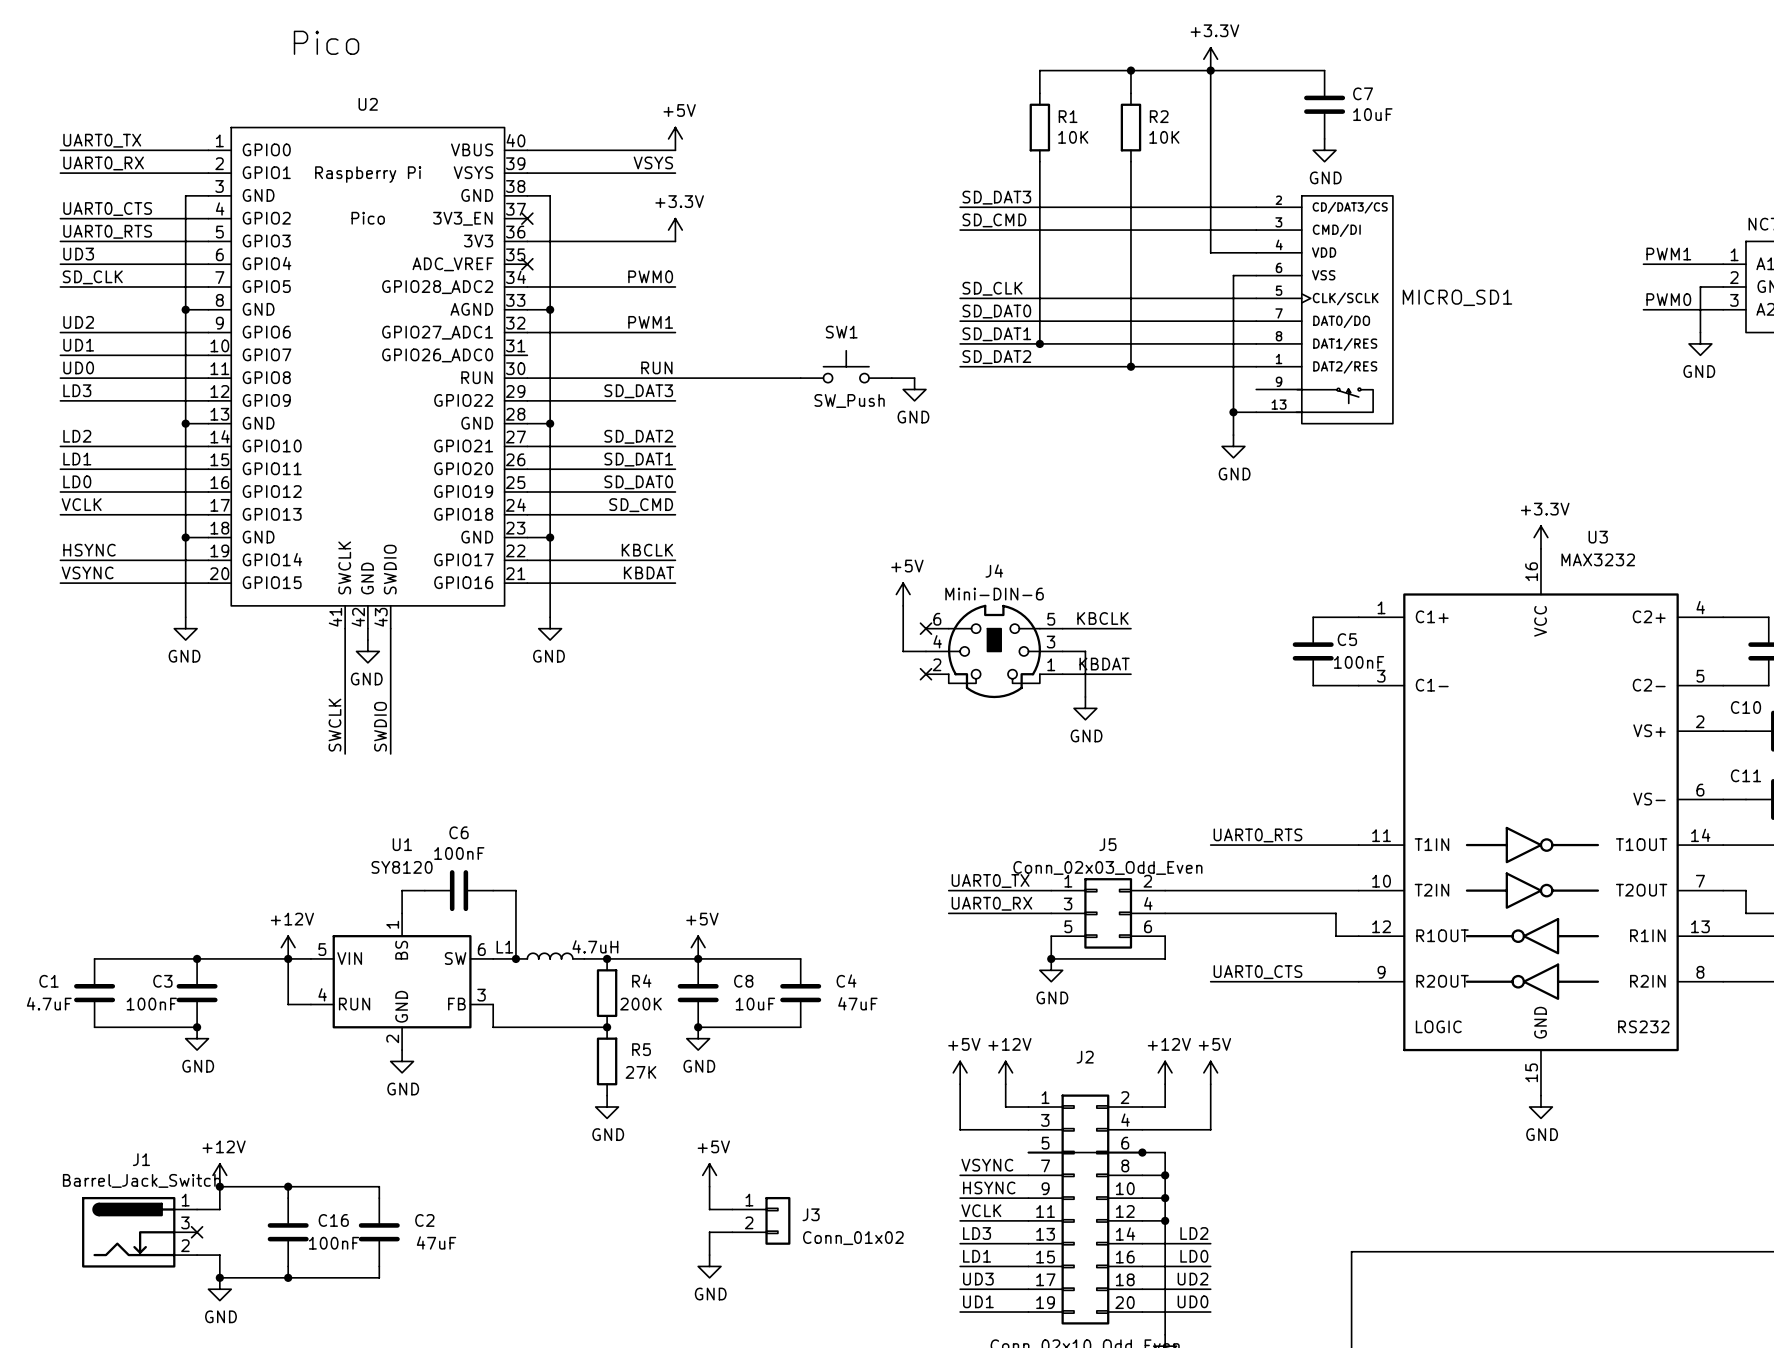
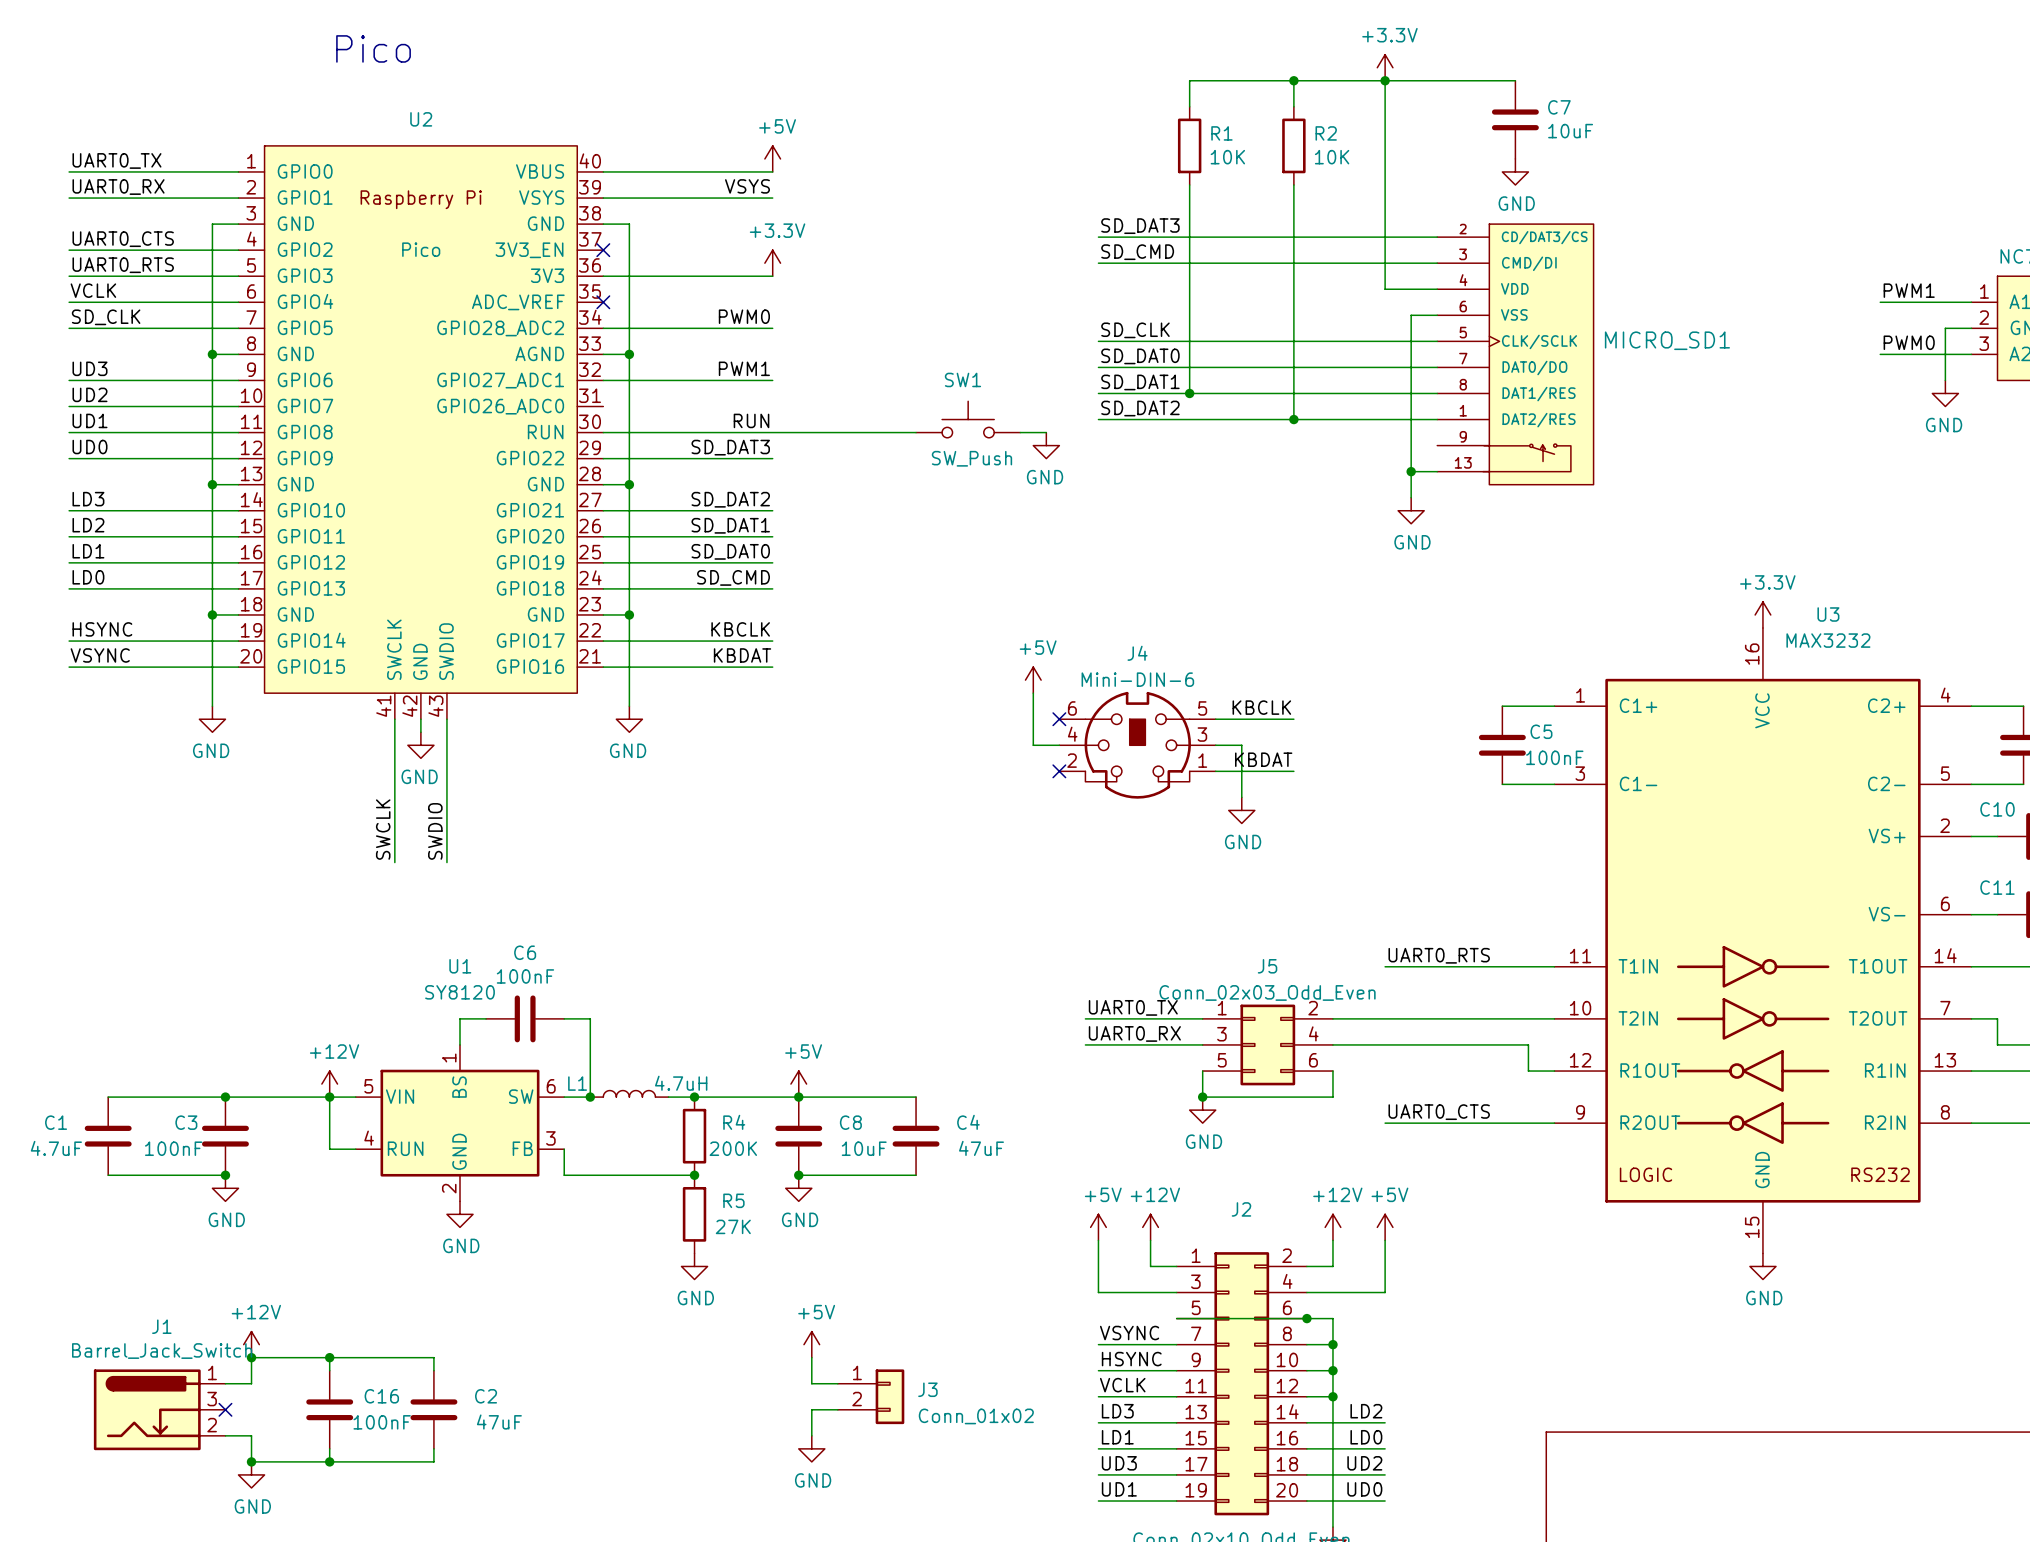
label: UD3 (78, 254) -> VCLK (93, 290)
label: UD2 (78, 322) -> UD3 (89, 368)
label: UD1 (78, 345) -> UD2 (89, 394)
label: UD0 (78, 367) -> UD1 (89, 420)
label: LD3 (77, 390) -> UD0 (89, 447)
label: LD2 (77, 436) -> LD3 (88, 499)
label: LD1 (77, 459) -> LD2 (88, 525)
label: LD0 (77, 481) -> LD1 (88, 551)
label: VCLK (81, 504) -> LD0 (88, 577)

